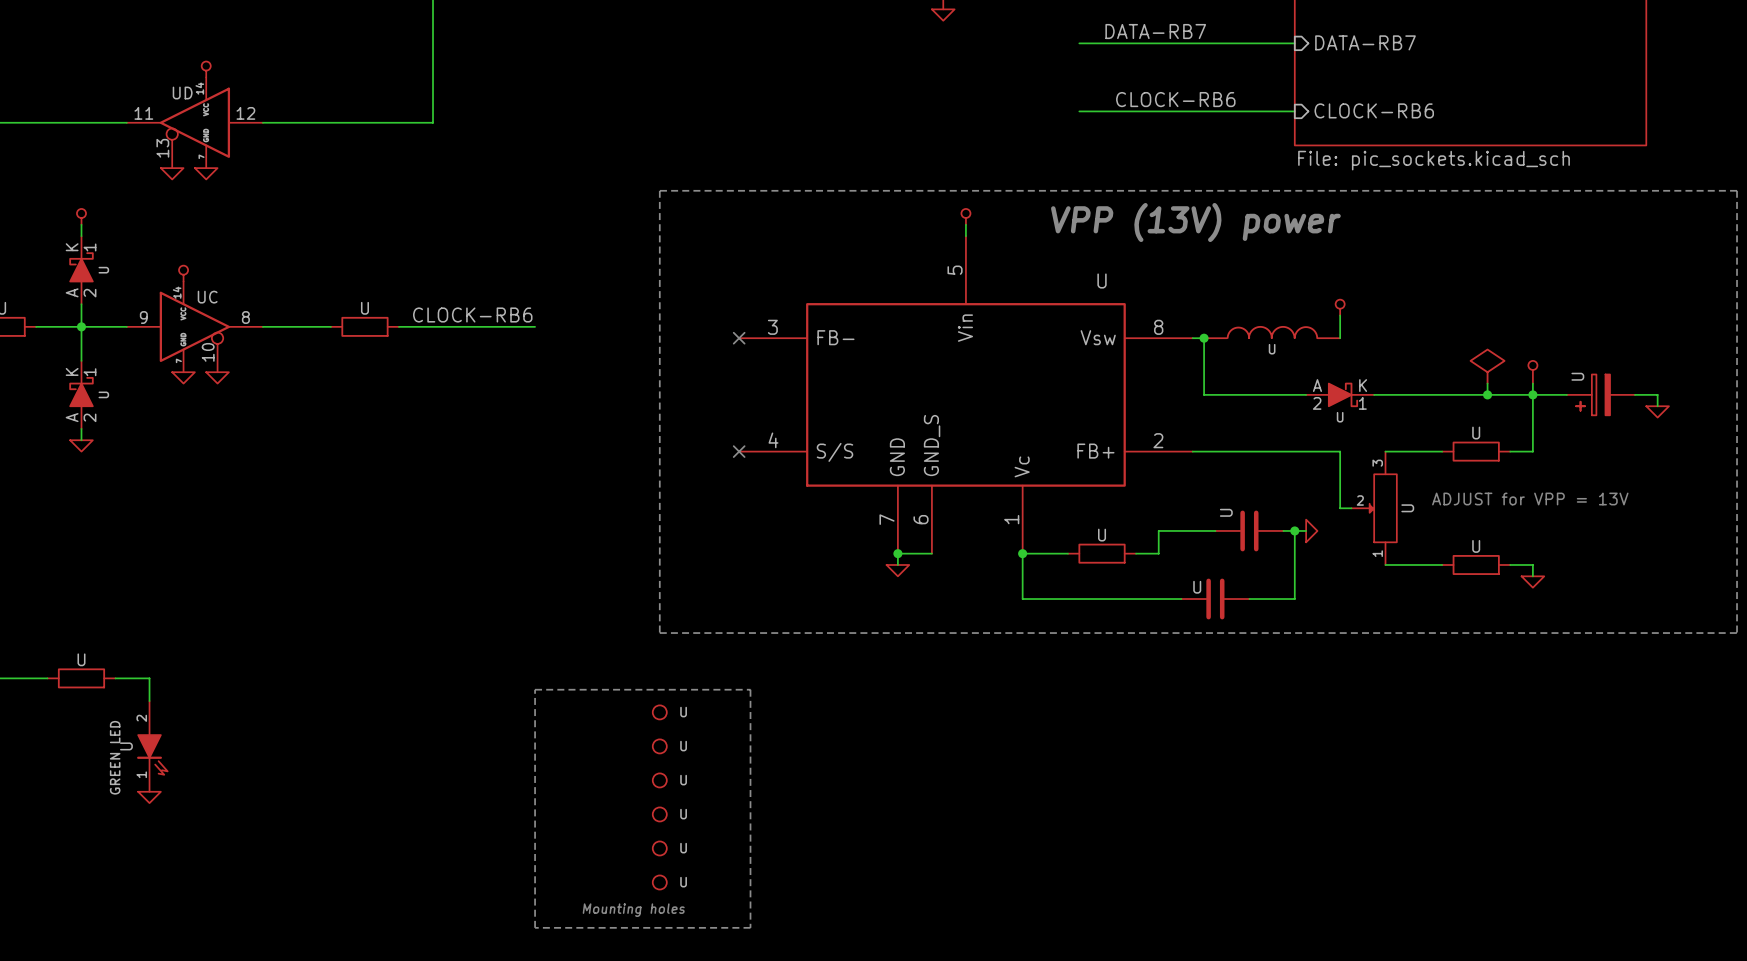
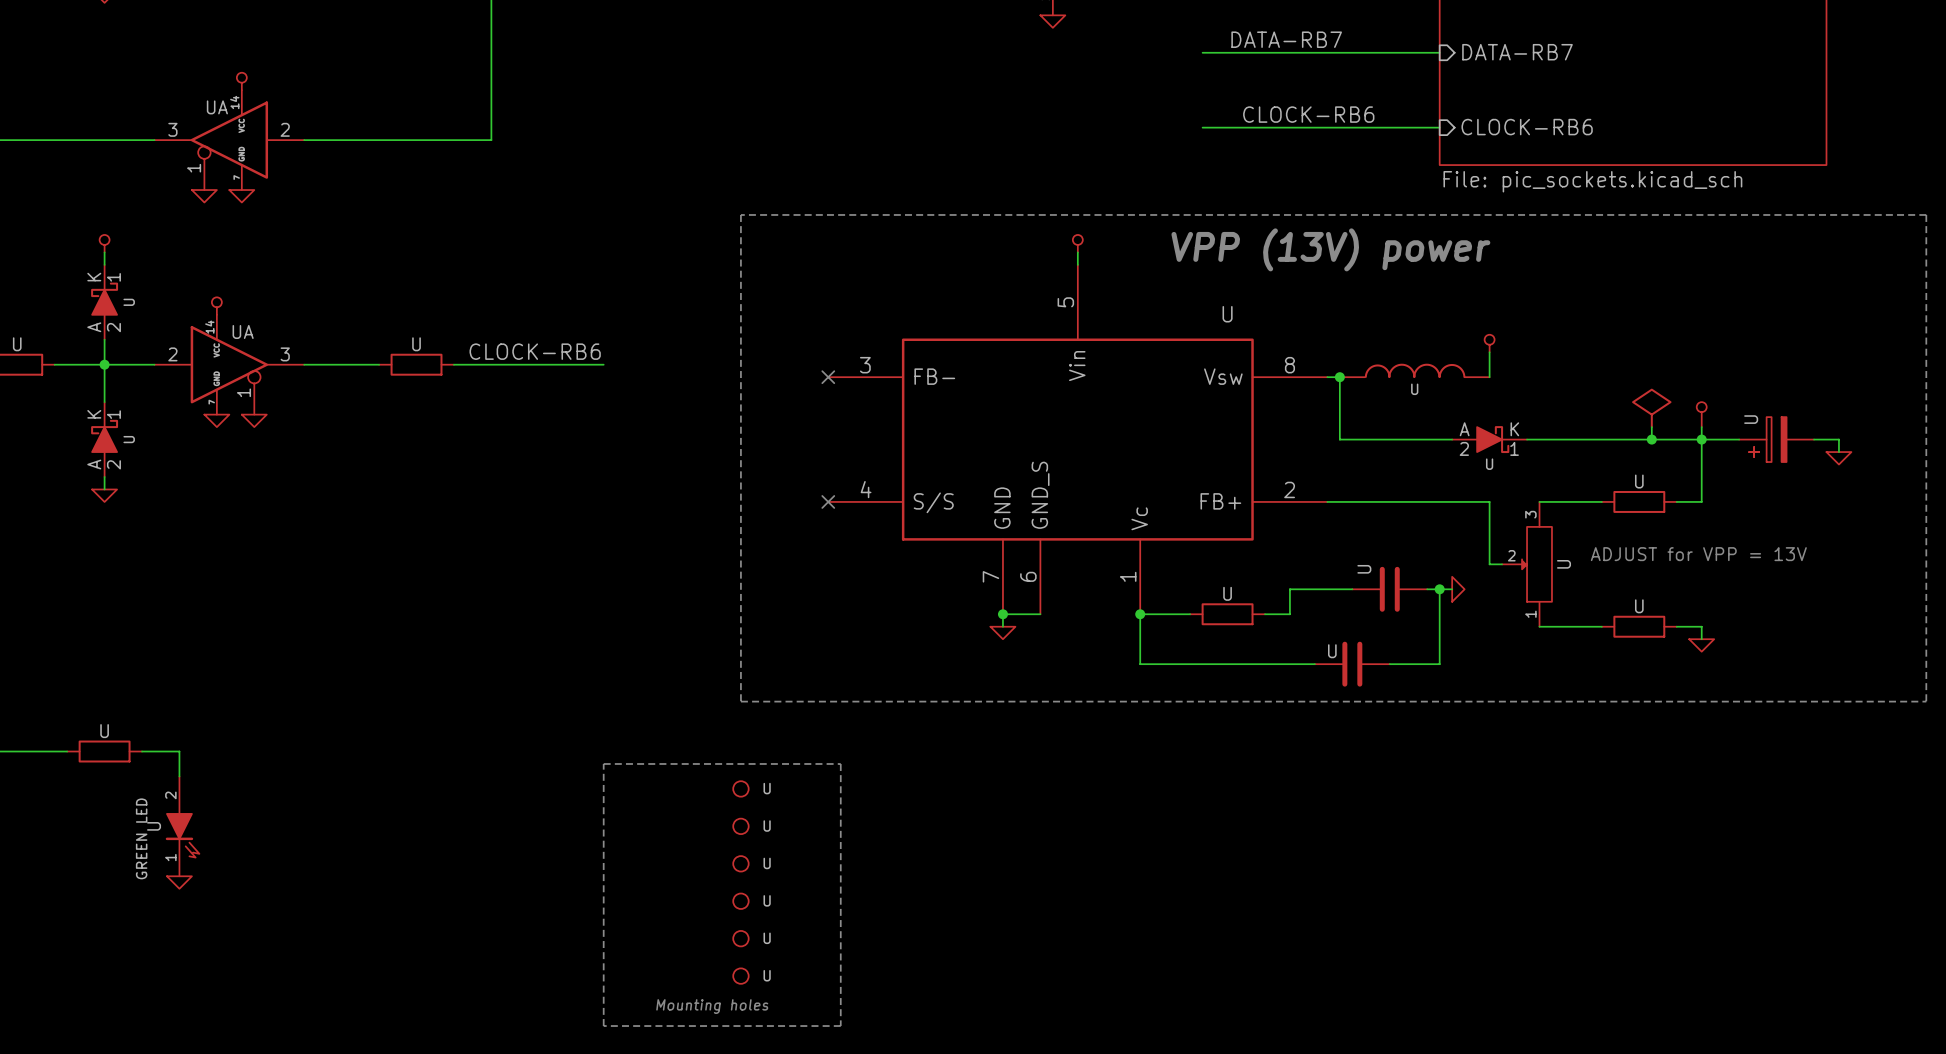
UD name: UD (182, 93) -> UA (217, 107)
UD pin number: 11 (143, 113) -> 3 (172, 129)
UD pin number: 12 (245, 113) -> 2 (285, 129)
UD pin number: 13 (162, 148) -> 1 (194, 168)
UC name: UC (207, 297) -> UA (243, 331)
UC pin number: 9 (143, 317) -> 2 (172, 354)
UC pin number: 8 (245, 317) -> 3 (285, 354)
UC pin number: 10 (208, 352) -> 1 (244, 392)

